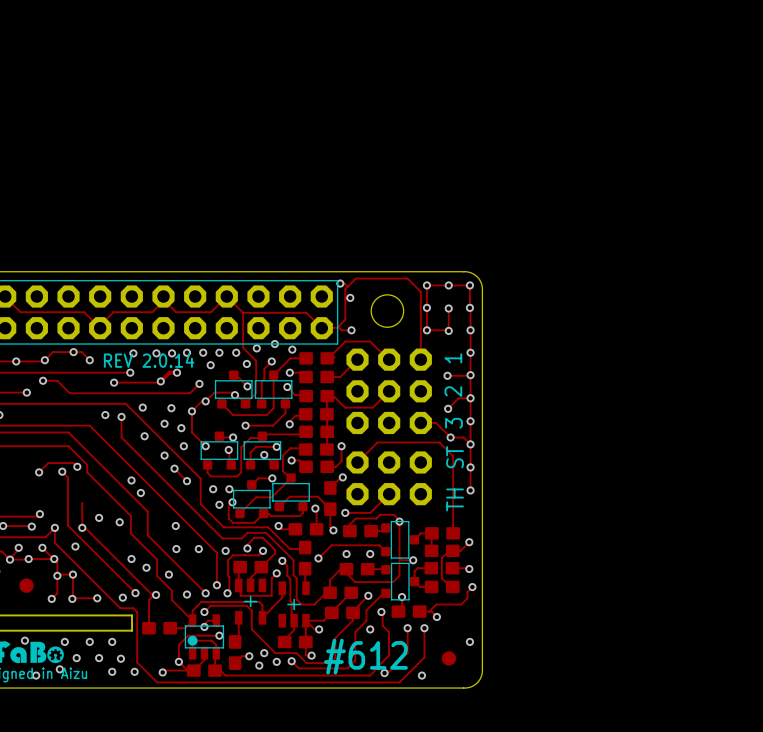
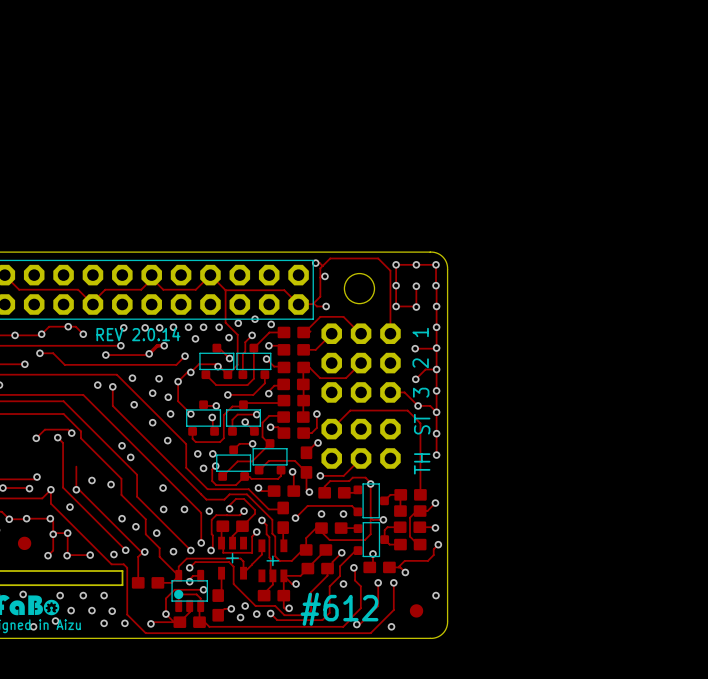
track: (174, 468) (187, 481) -> none
via: (174, 468) -> none
via: none -> (167, 440)
via: (187, 481) -> none
track: (18, 547) (9, 559) -> none
via: (18, 547) -> none
track: (42, 547) (52, 559) -> none
via: (42, 547) -> none

